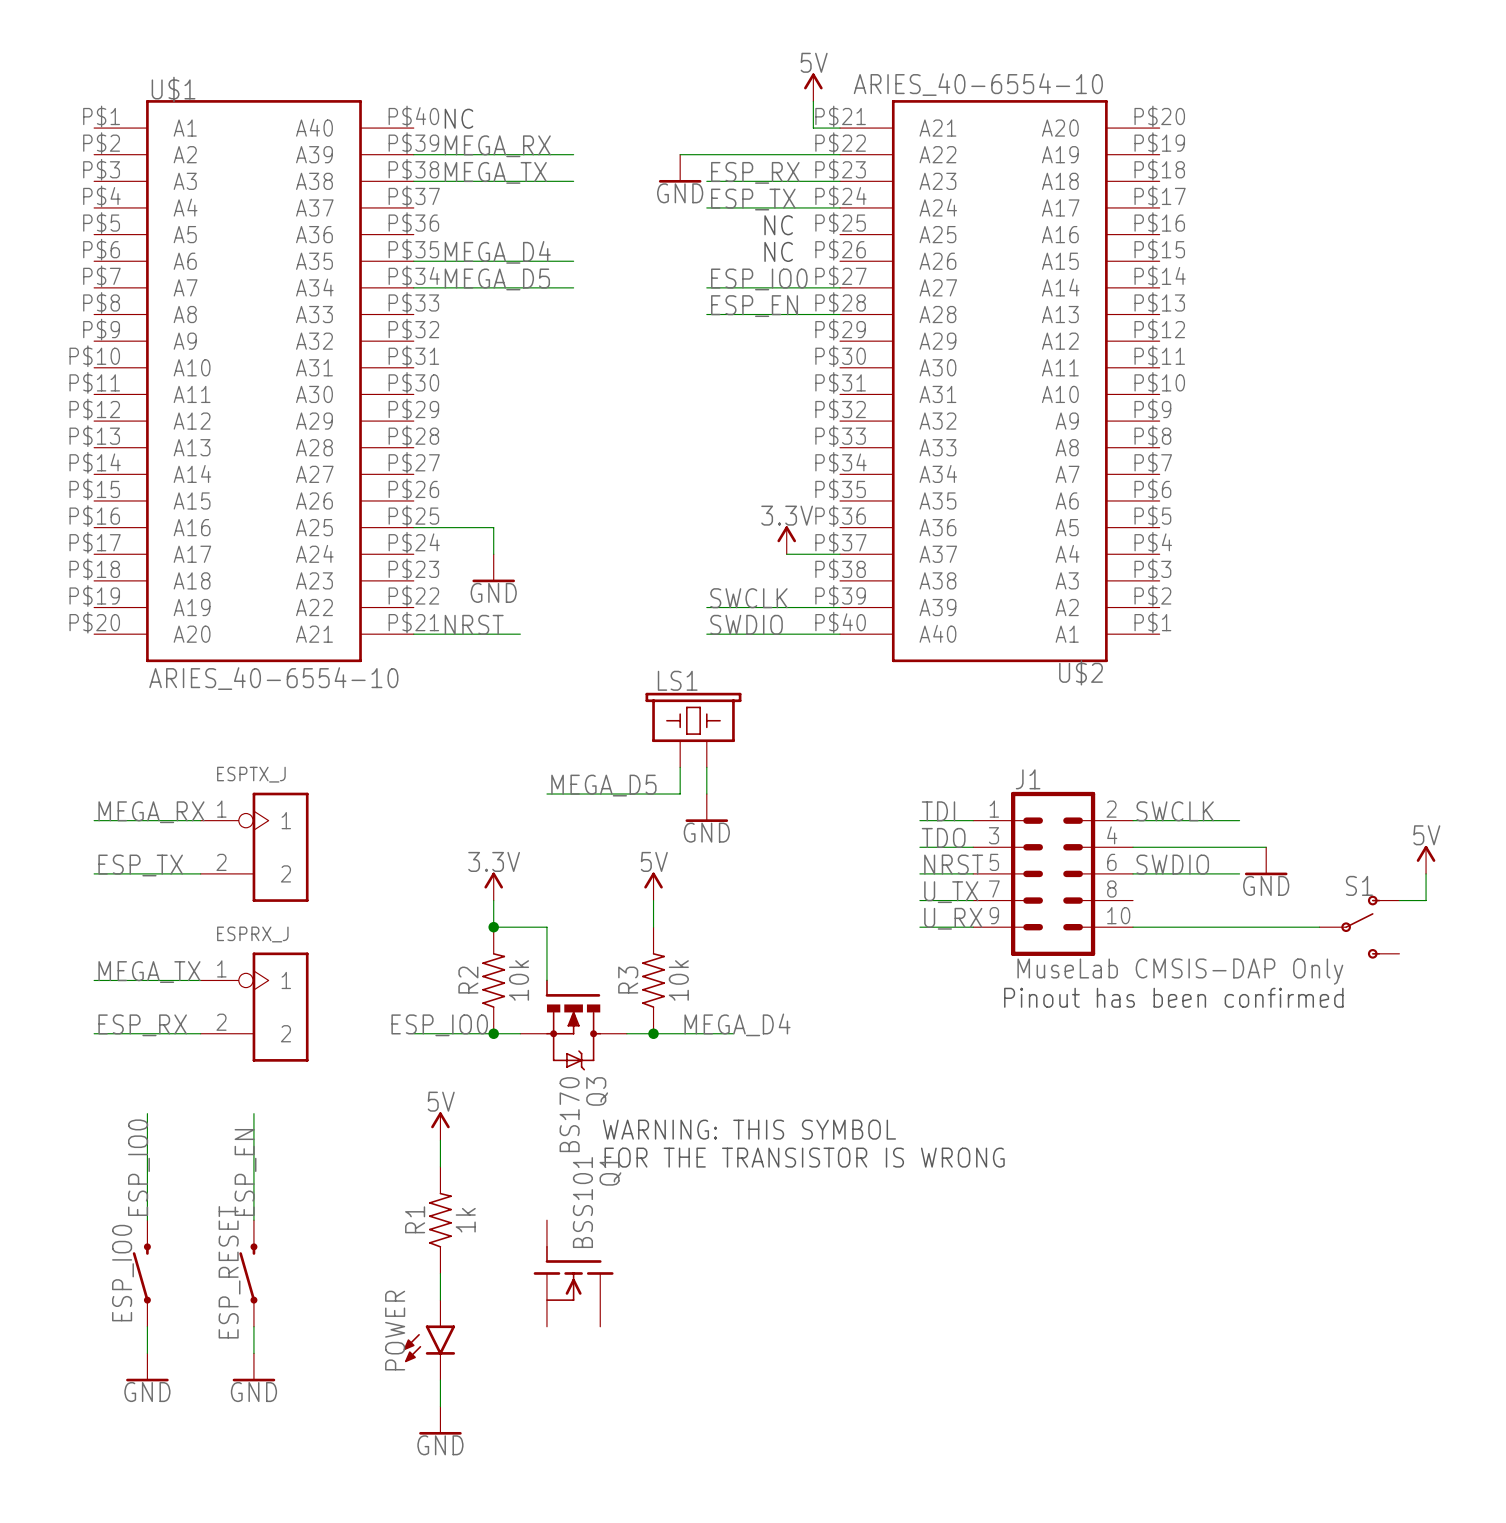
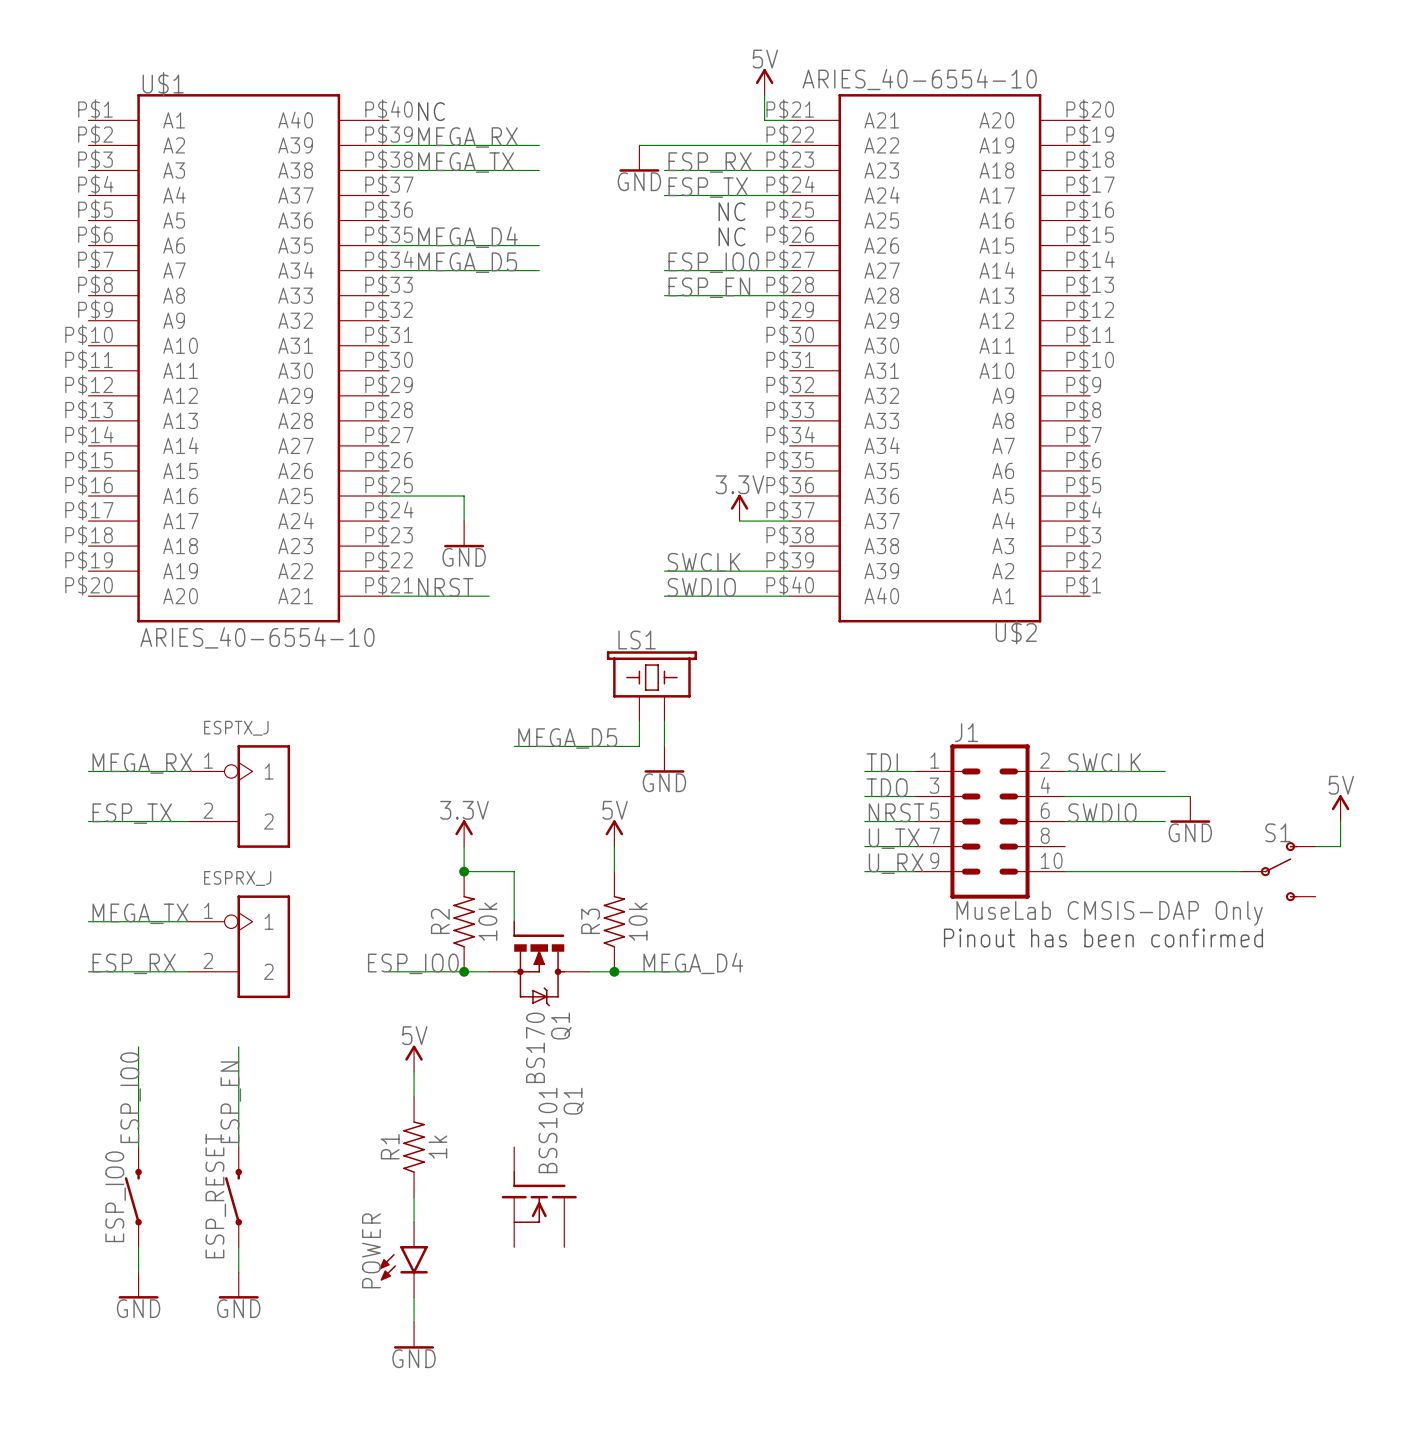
Q3 name: Q3 (597, 1091) -> Q1 (561, 1026)
text: WARNING: THIS SYMBOL (749, 1129) -> none
text: FOR THE TRANSISTOR IS WRONG (804, 1157) -> none

